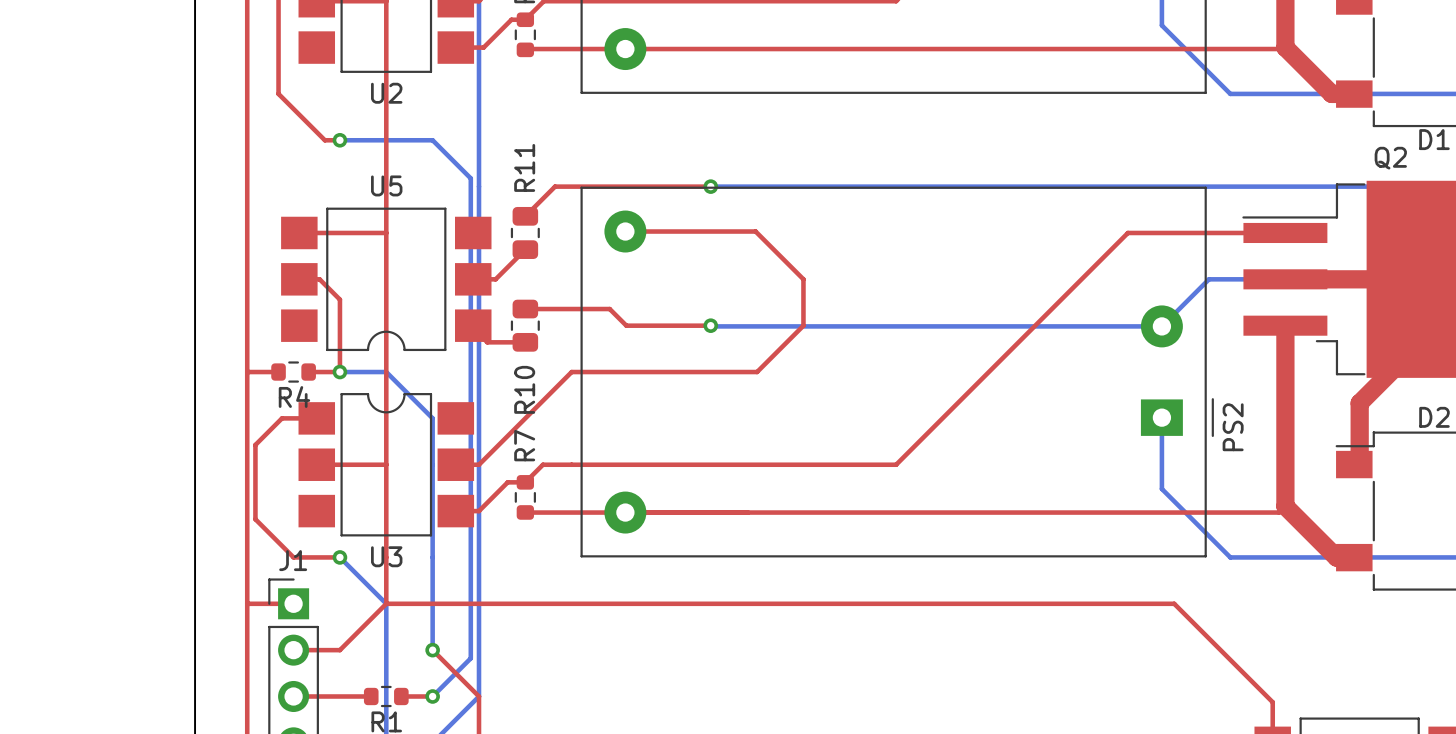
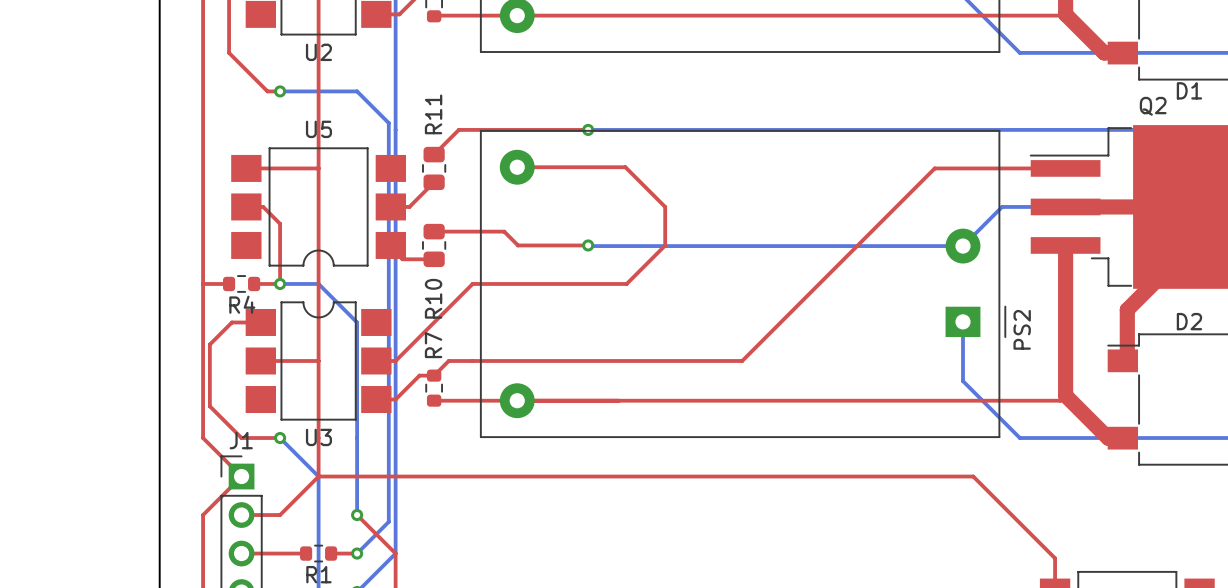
top track: (247, 557) (247, 650) -> (203, 438) (241, 476) (203, 515)
top track: (247, 603) (293, 603) -> none

